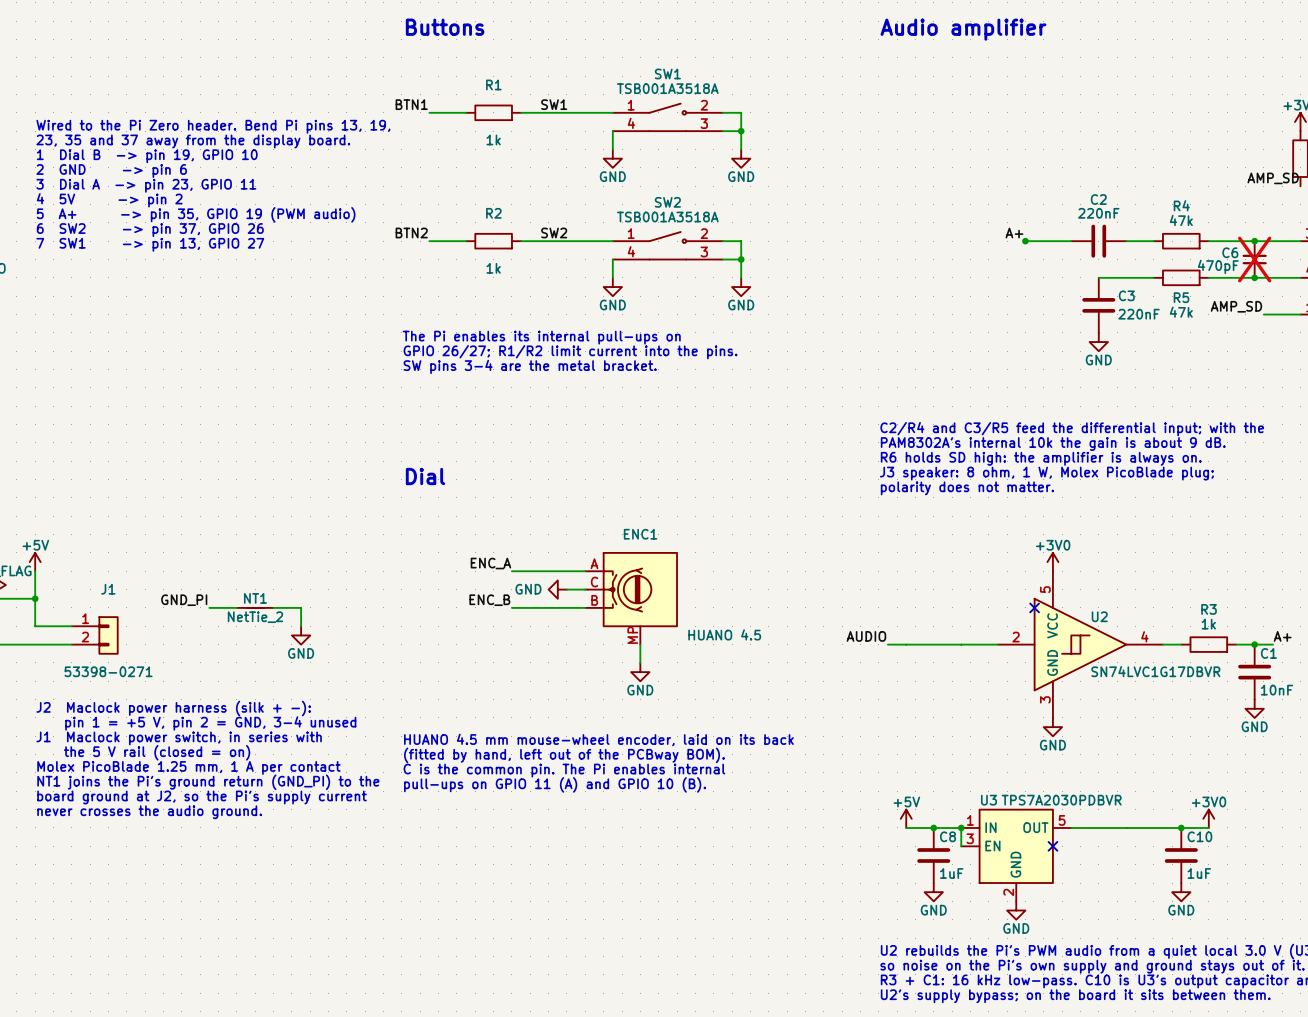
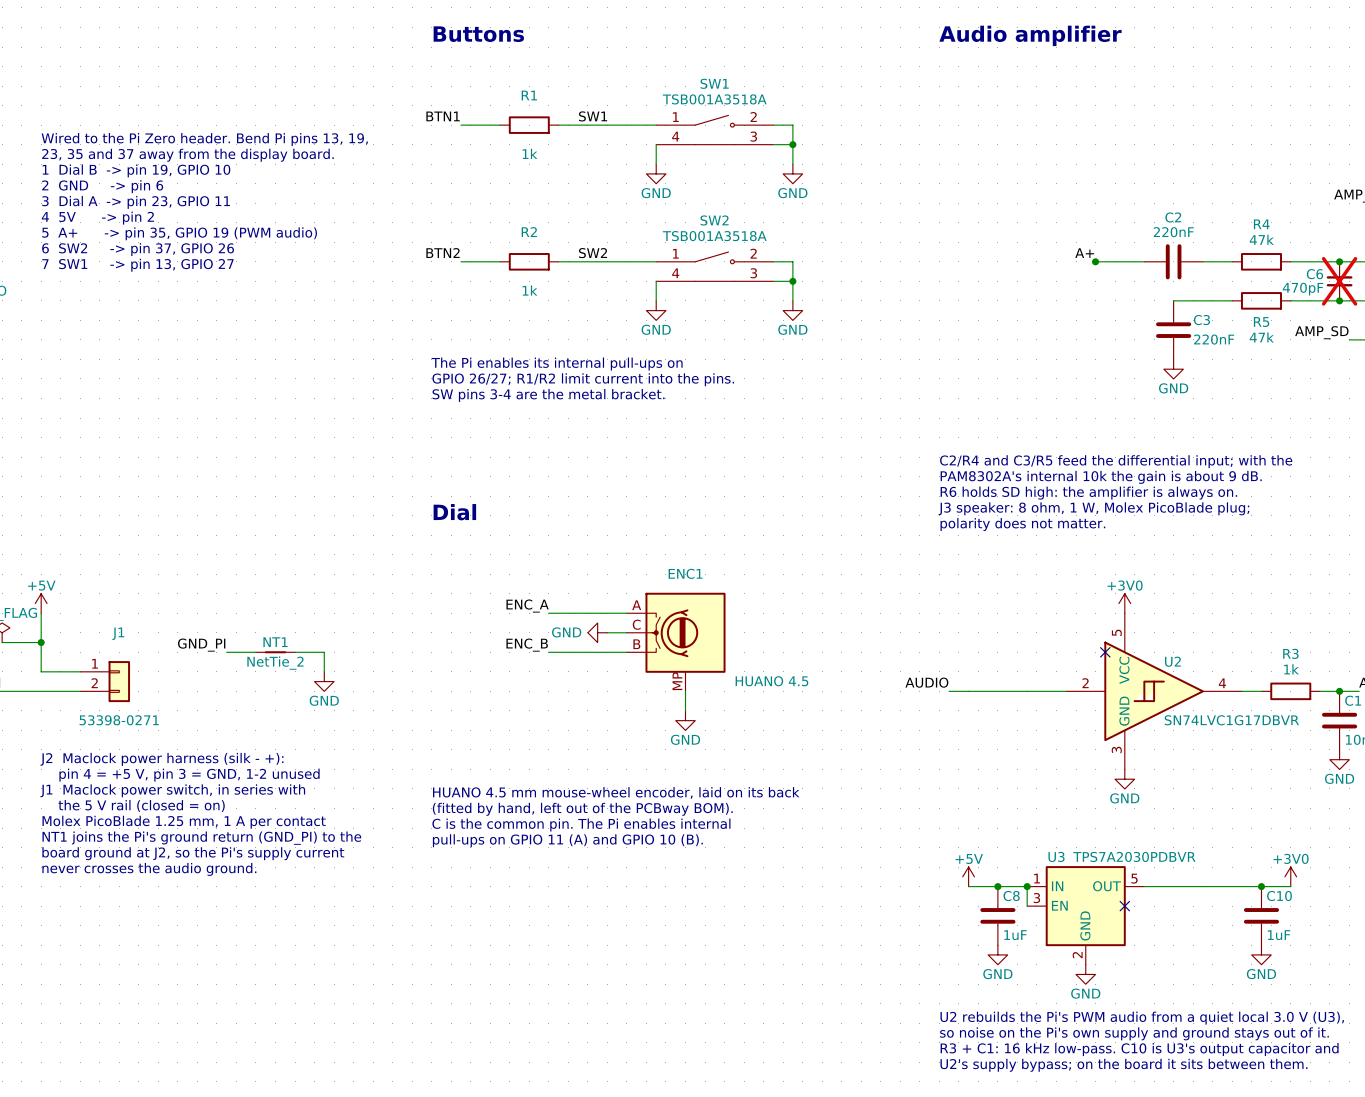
text: J2 Maclock power harness (silk + -): (173, 708) -> J2 Maclock power harness (silk - +): (161, 759)
text: pin 1 = +5 V, pin 2 = GND, 3-4 unused (210, 723) -> pin 4 = +5 V, pin 3 = GND, 1-2 unused (189, 775)

